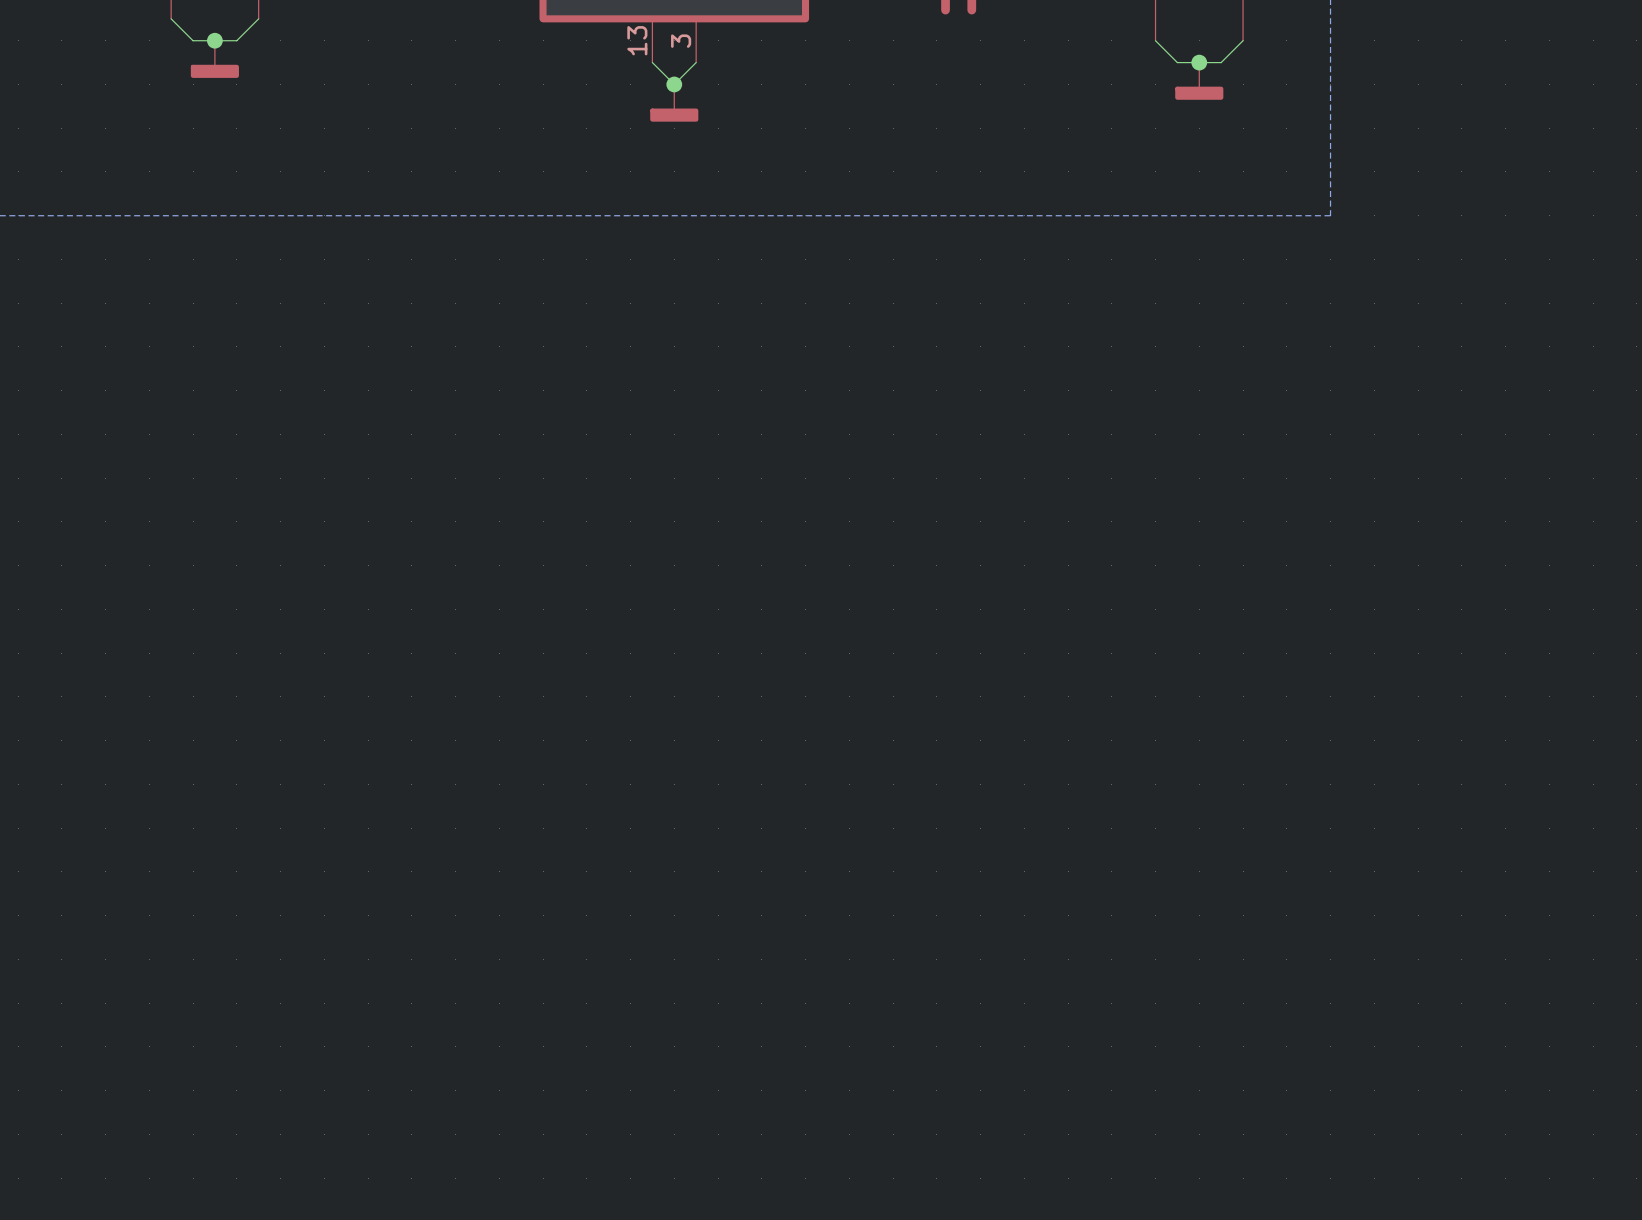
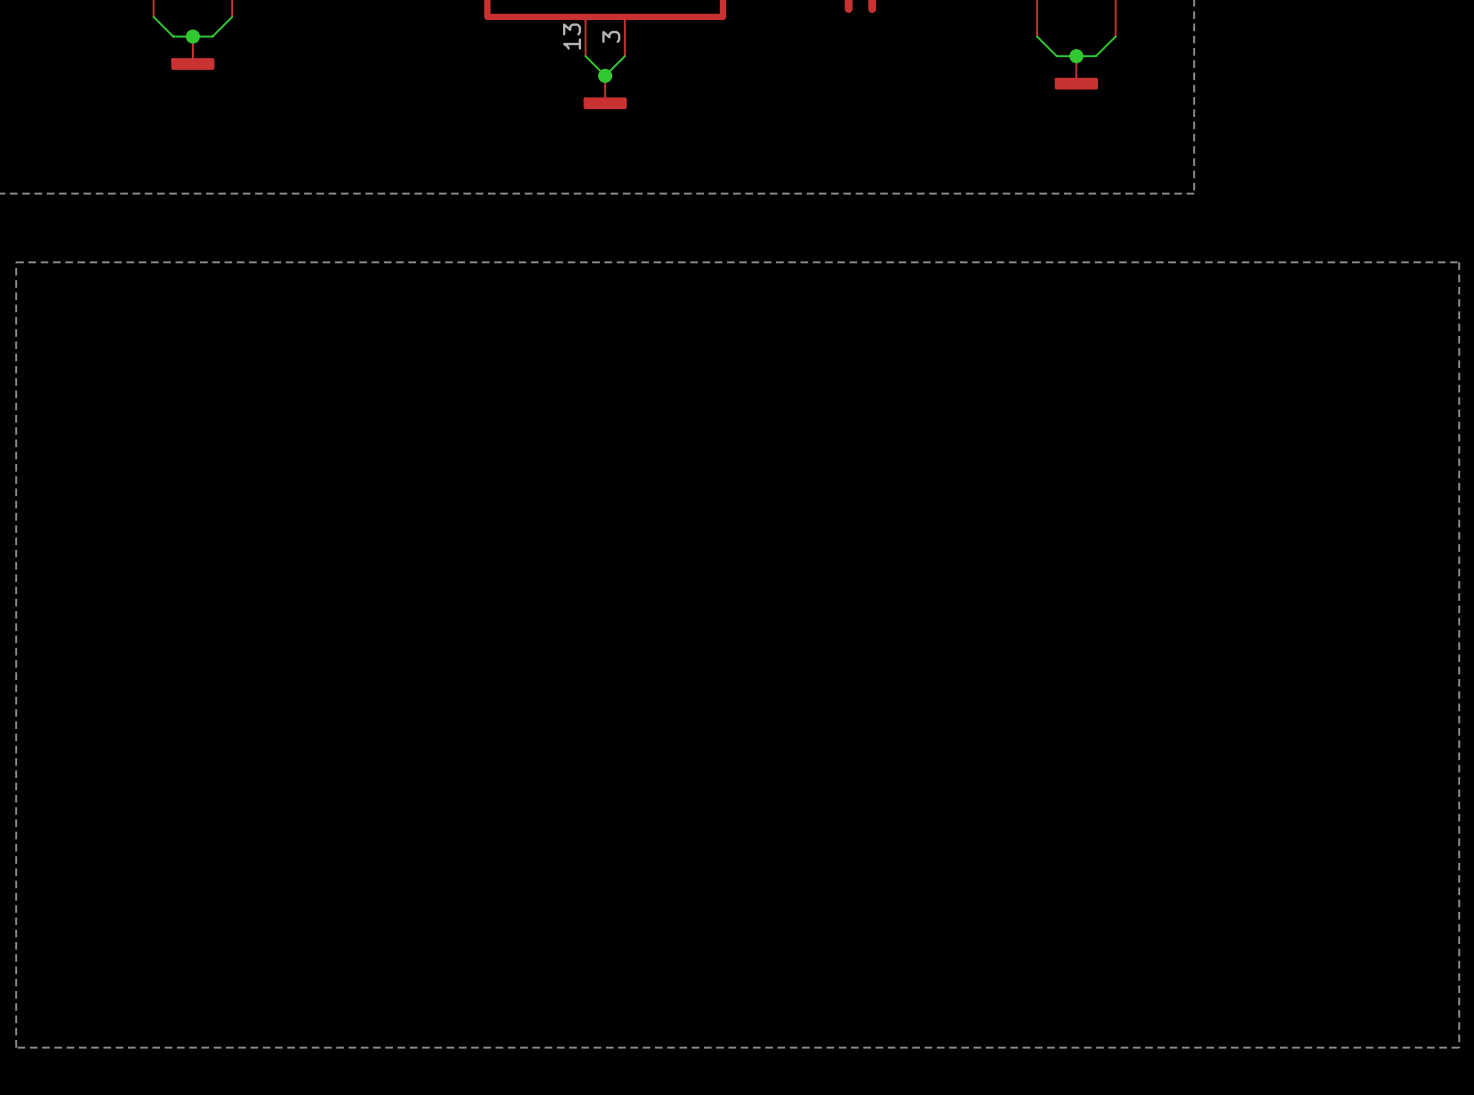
line: none -> (16, 262) (1459, 262) (1459, 1047) (16, 1047) (16, 262)

